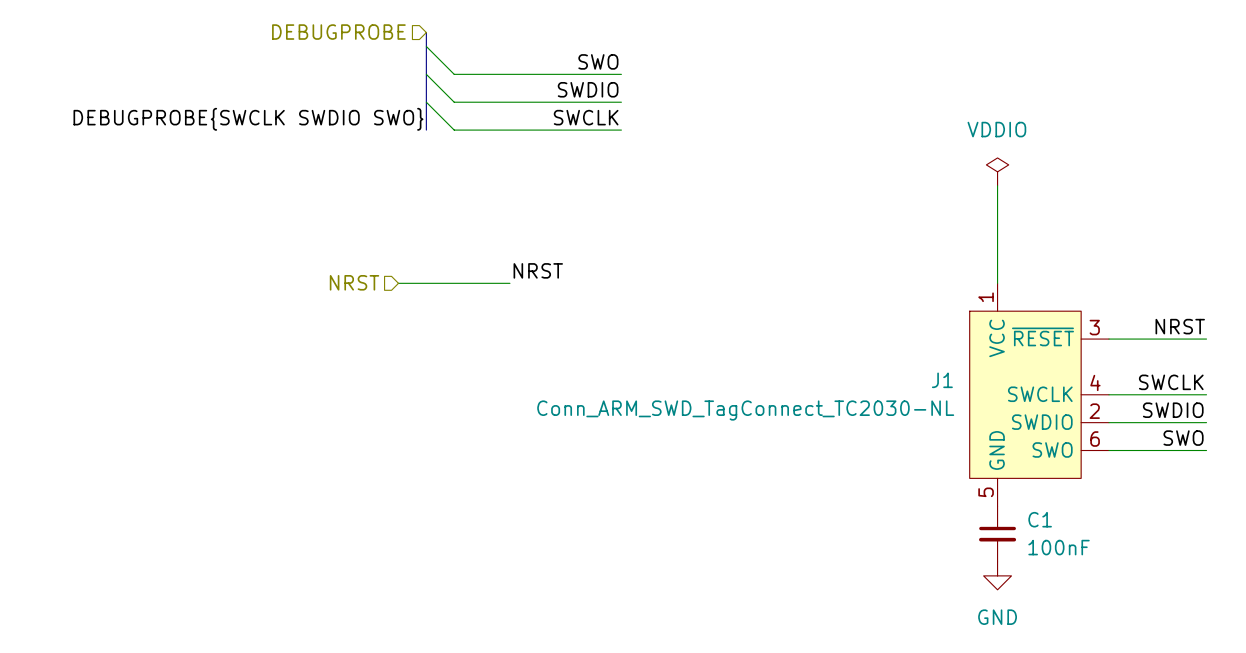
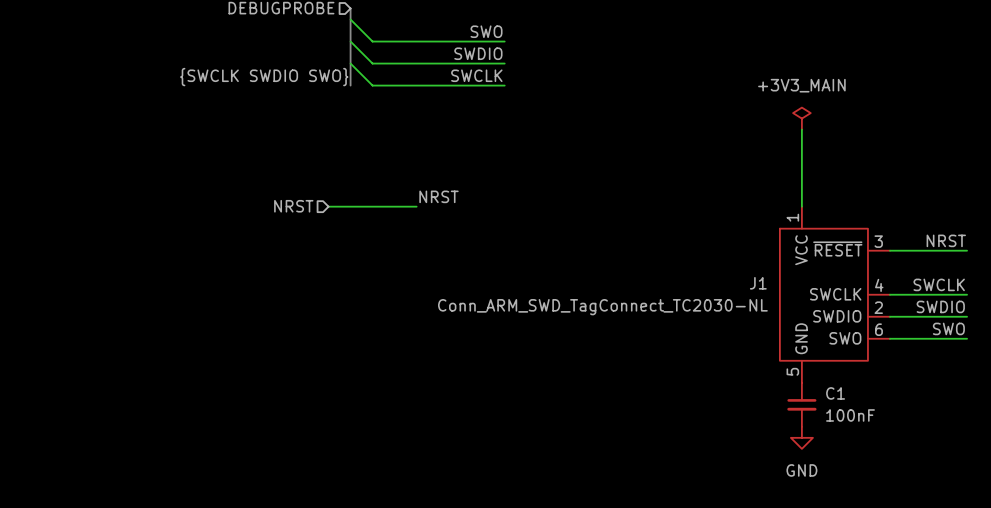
label: DEBUGPROBE{SWCLK SWDIO SWO} (248, 119) -> {SWCLK SWDIO SWO} (264, 77)
power symbol: VDDIO (997, 171) -> +3V3_MAIN (801, 118)

